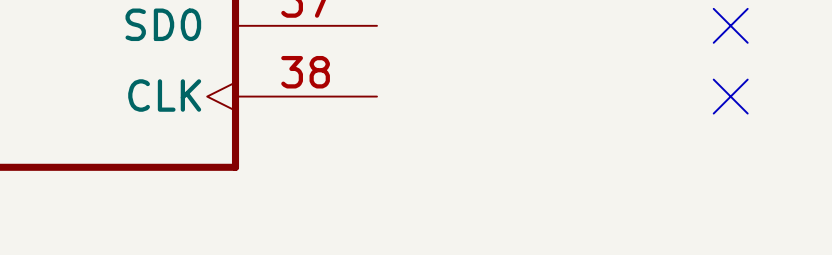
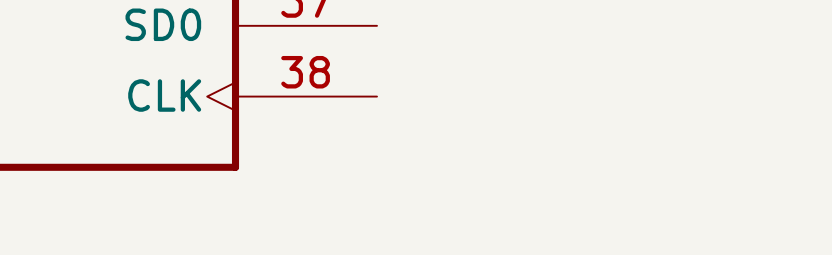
no-connect mark: (730, 25) -> none
no-connect mark: (730, 96) -> none

